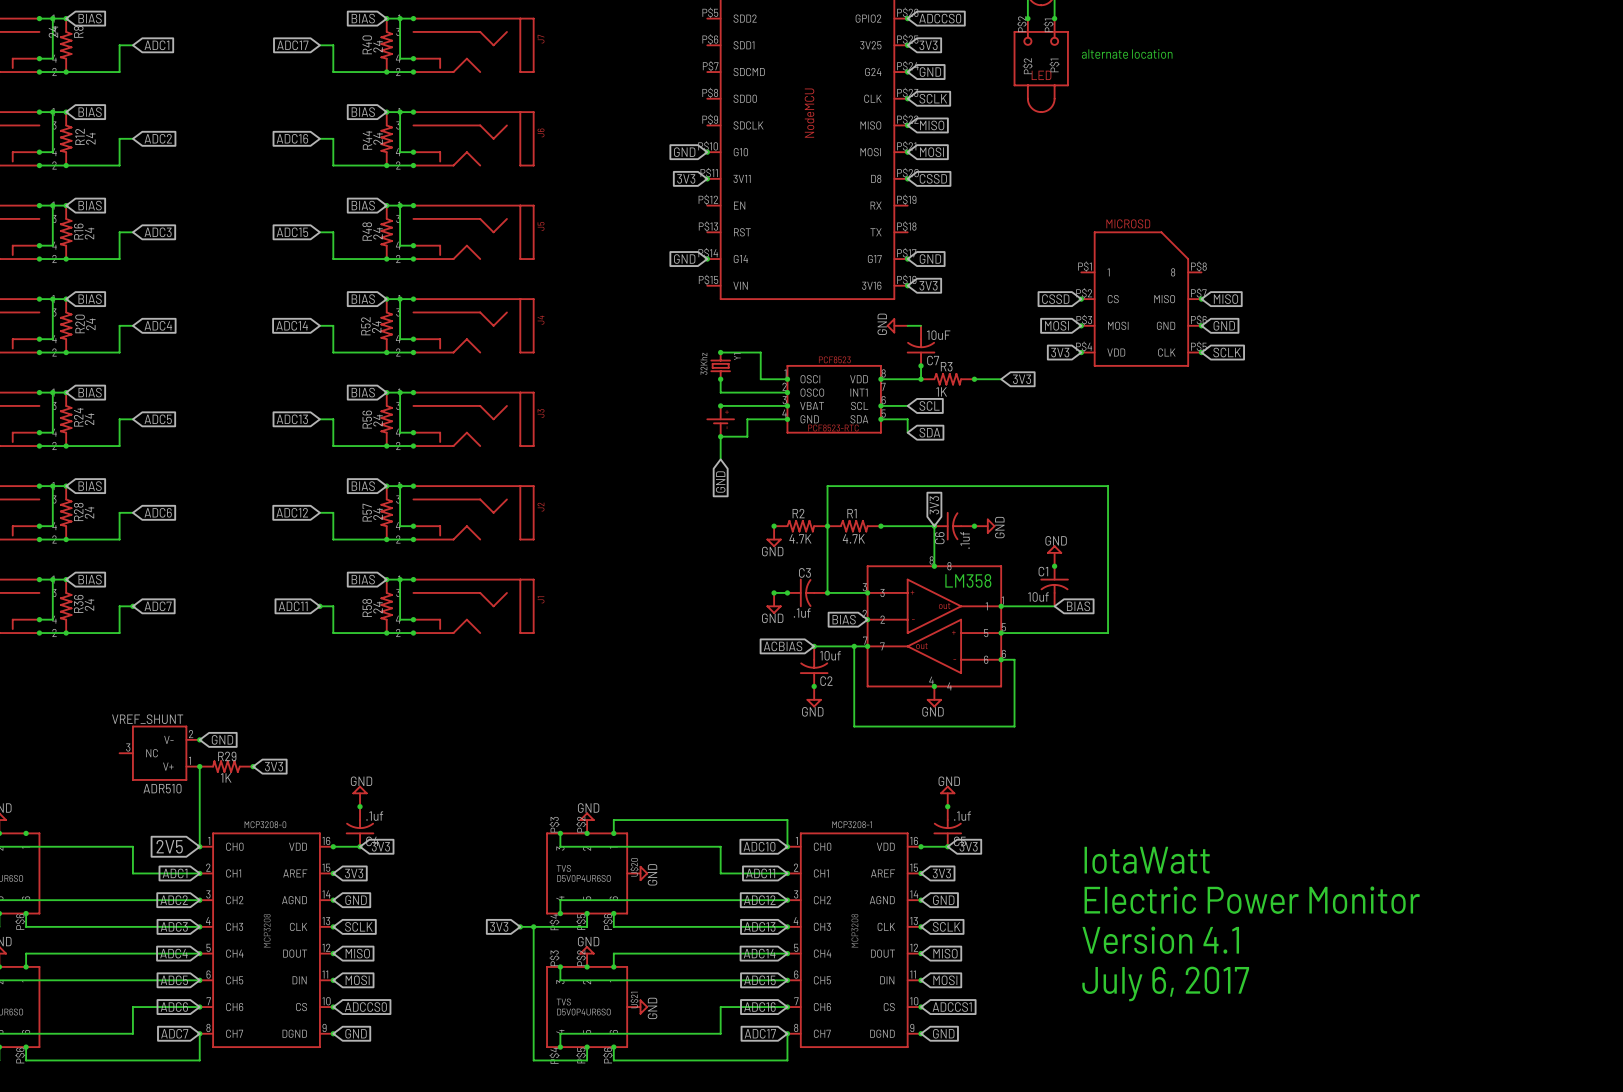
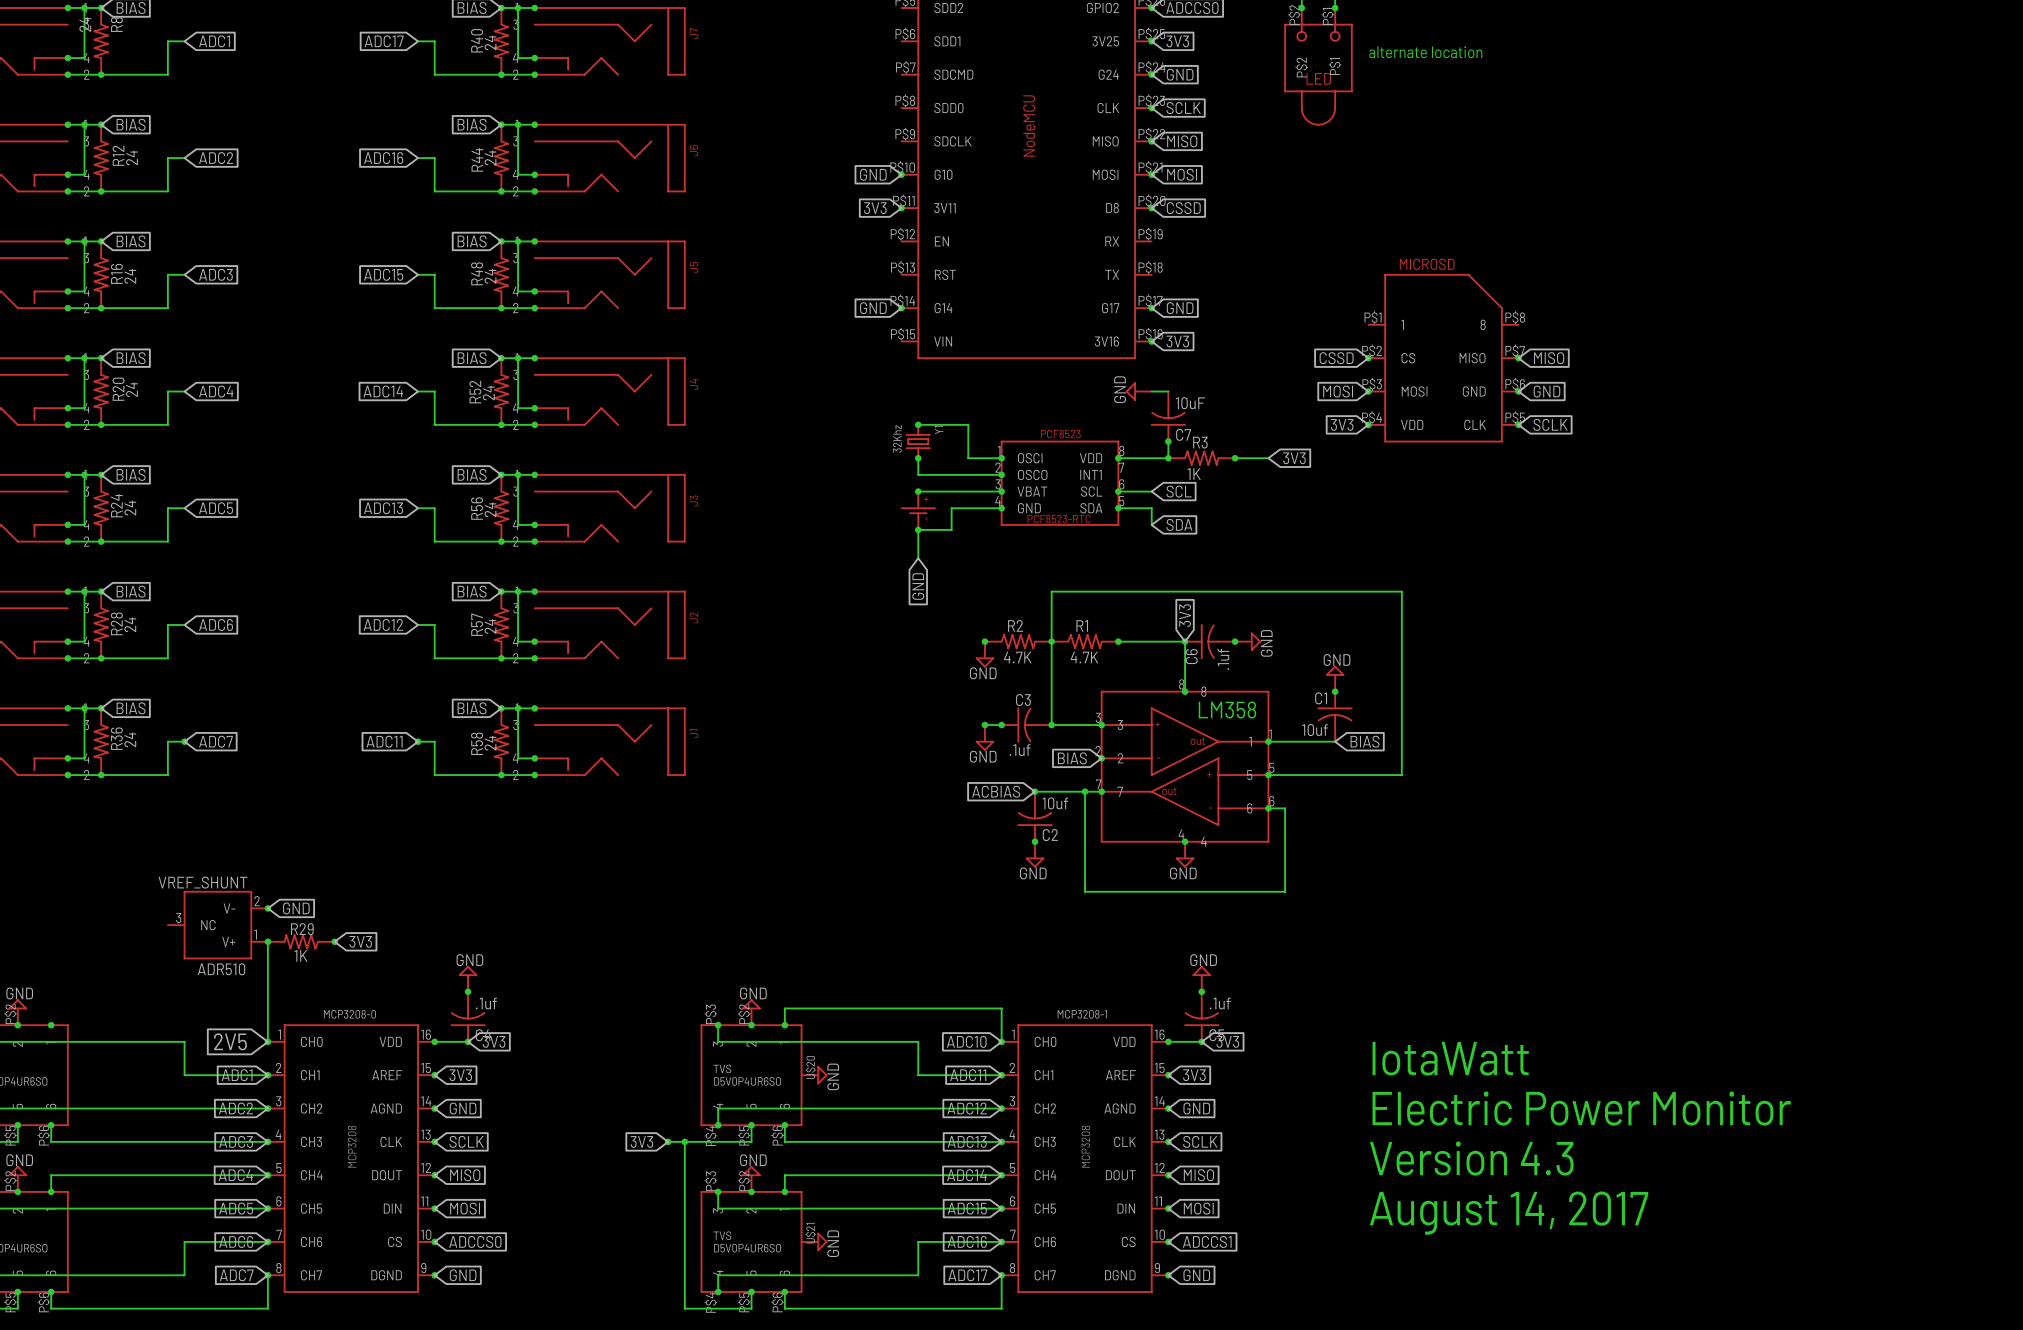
text: Version 4.1 (1160, 940) -> Version 4.3 (1471, 1158)
text: July 6, 2017 (1165, 983) -> August 14, 2017 (1509, 1213)

